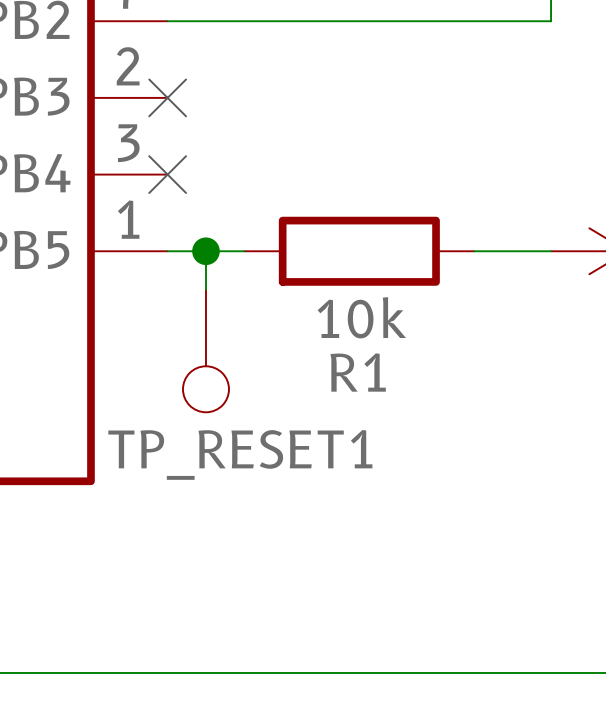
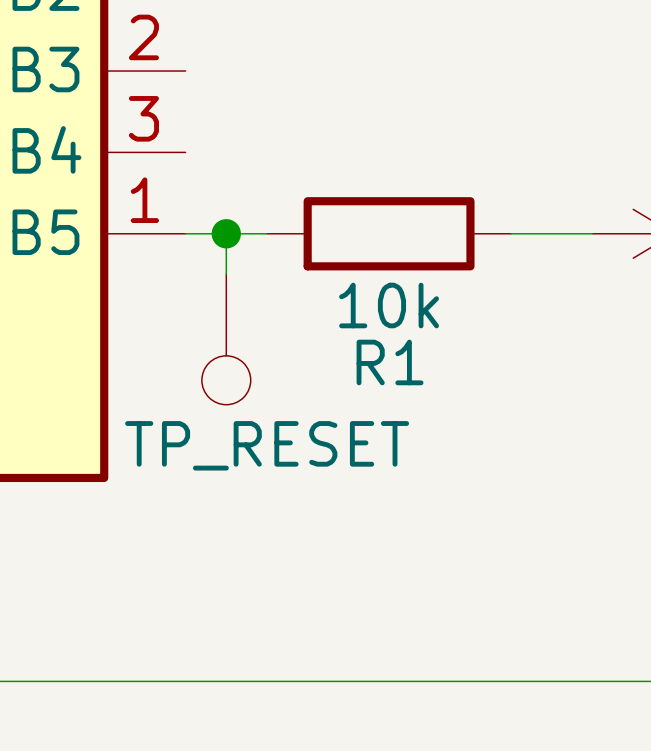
no-connect mark: (167, 97) -> none
no-connect mark: (167, 174) -> none
TP_RESET1 name: TP_RESET1 (240, 454) -> TP_RESET (267, 445)

